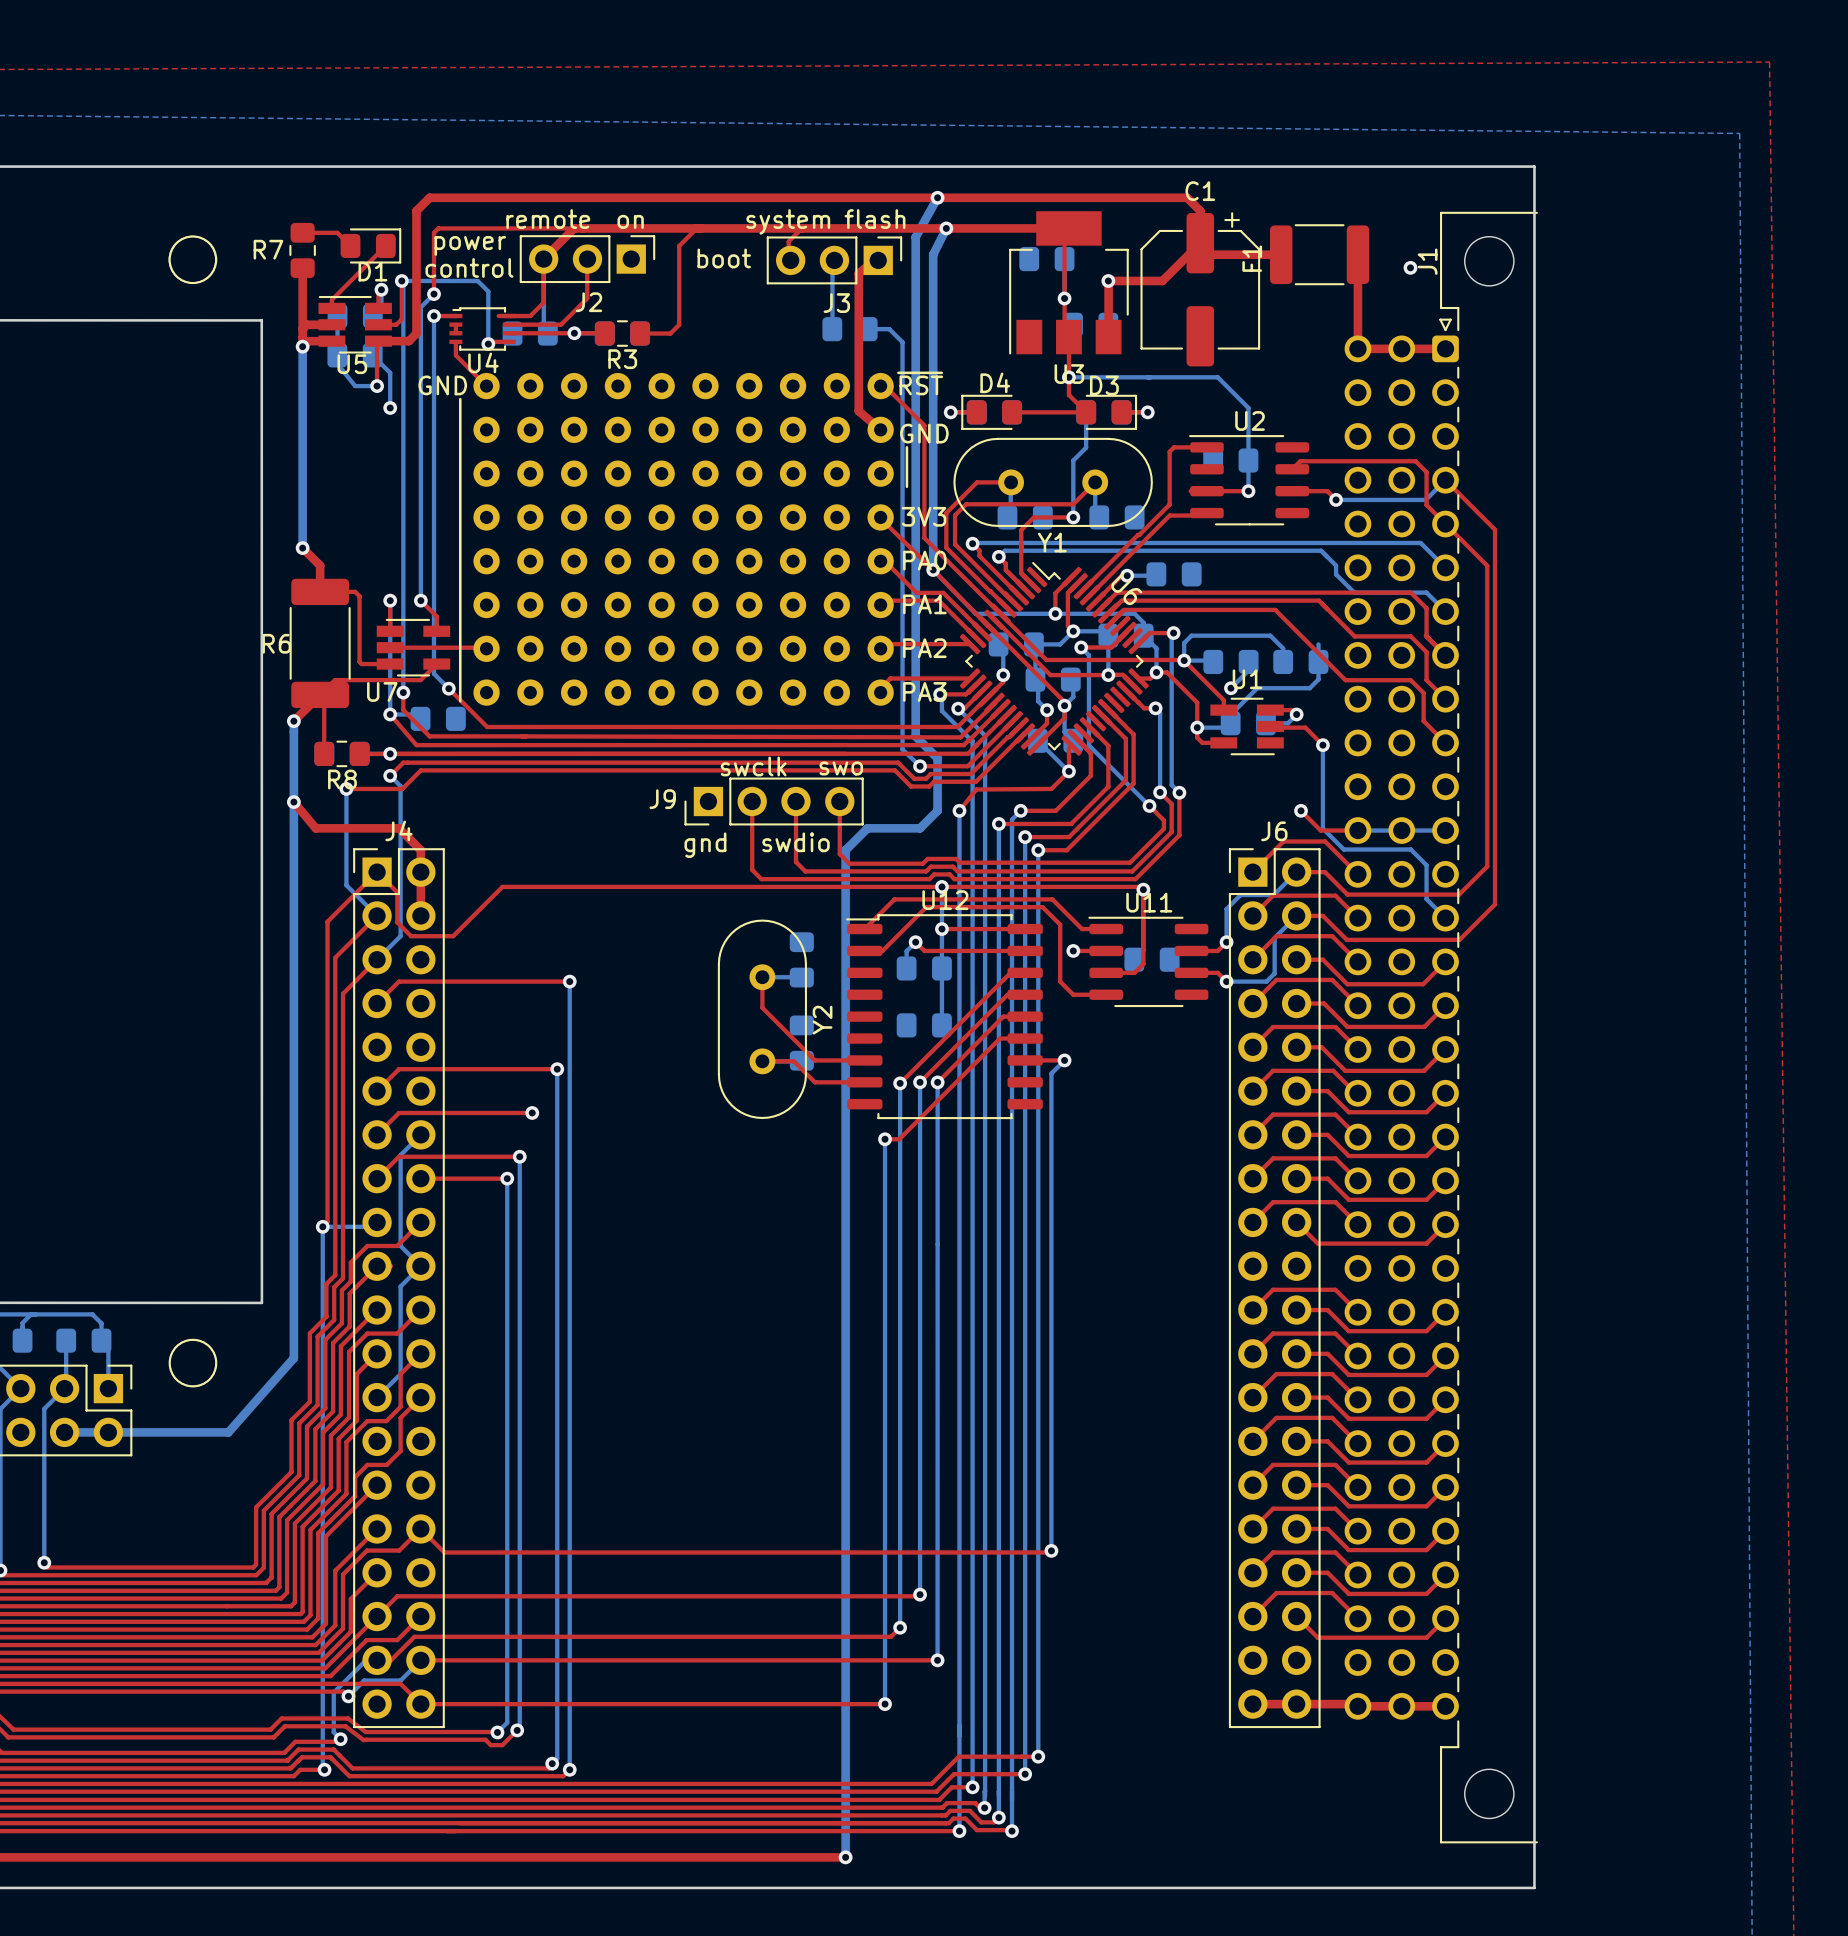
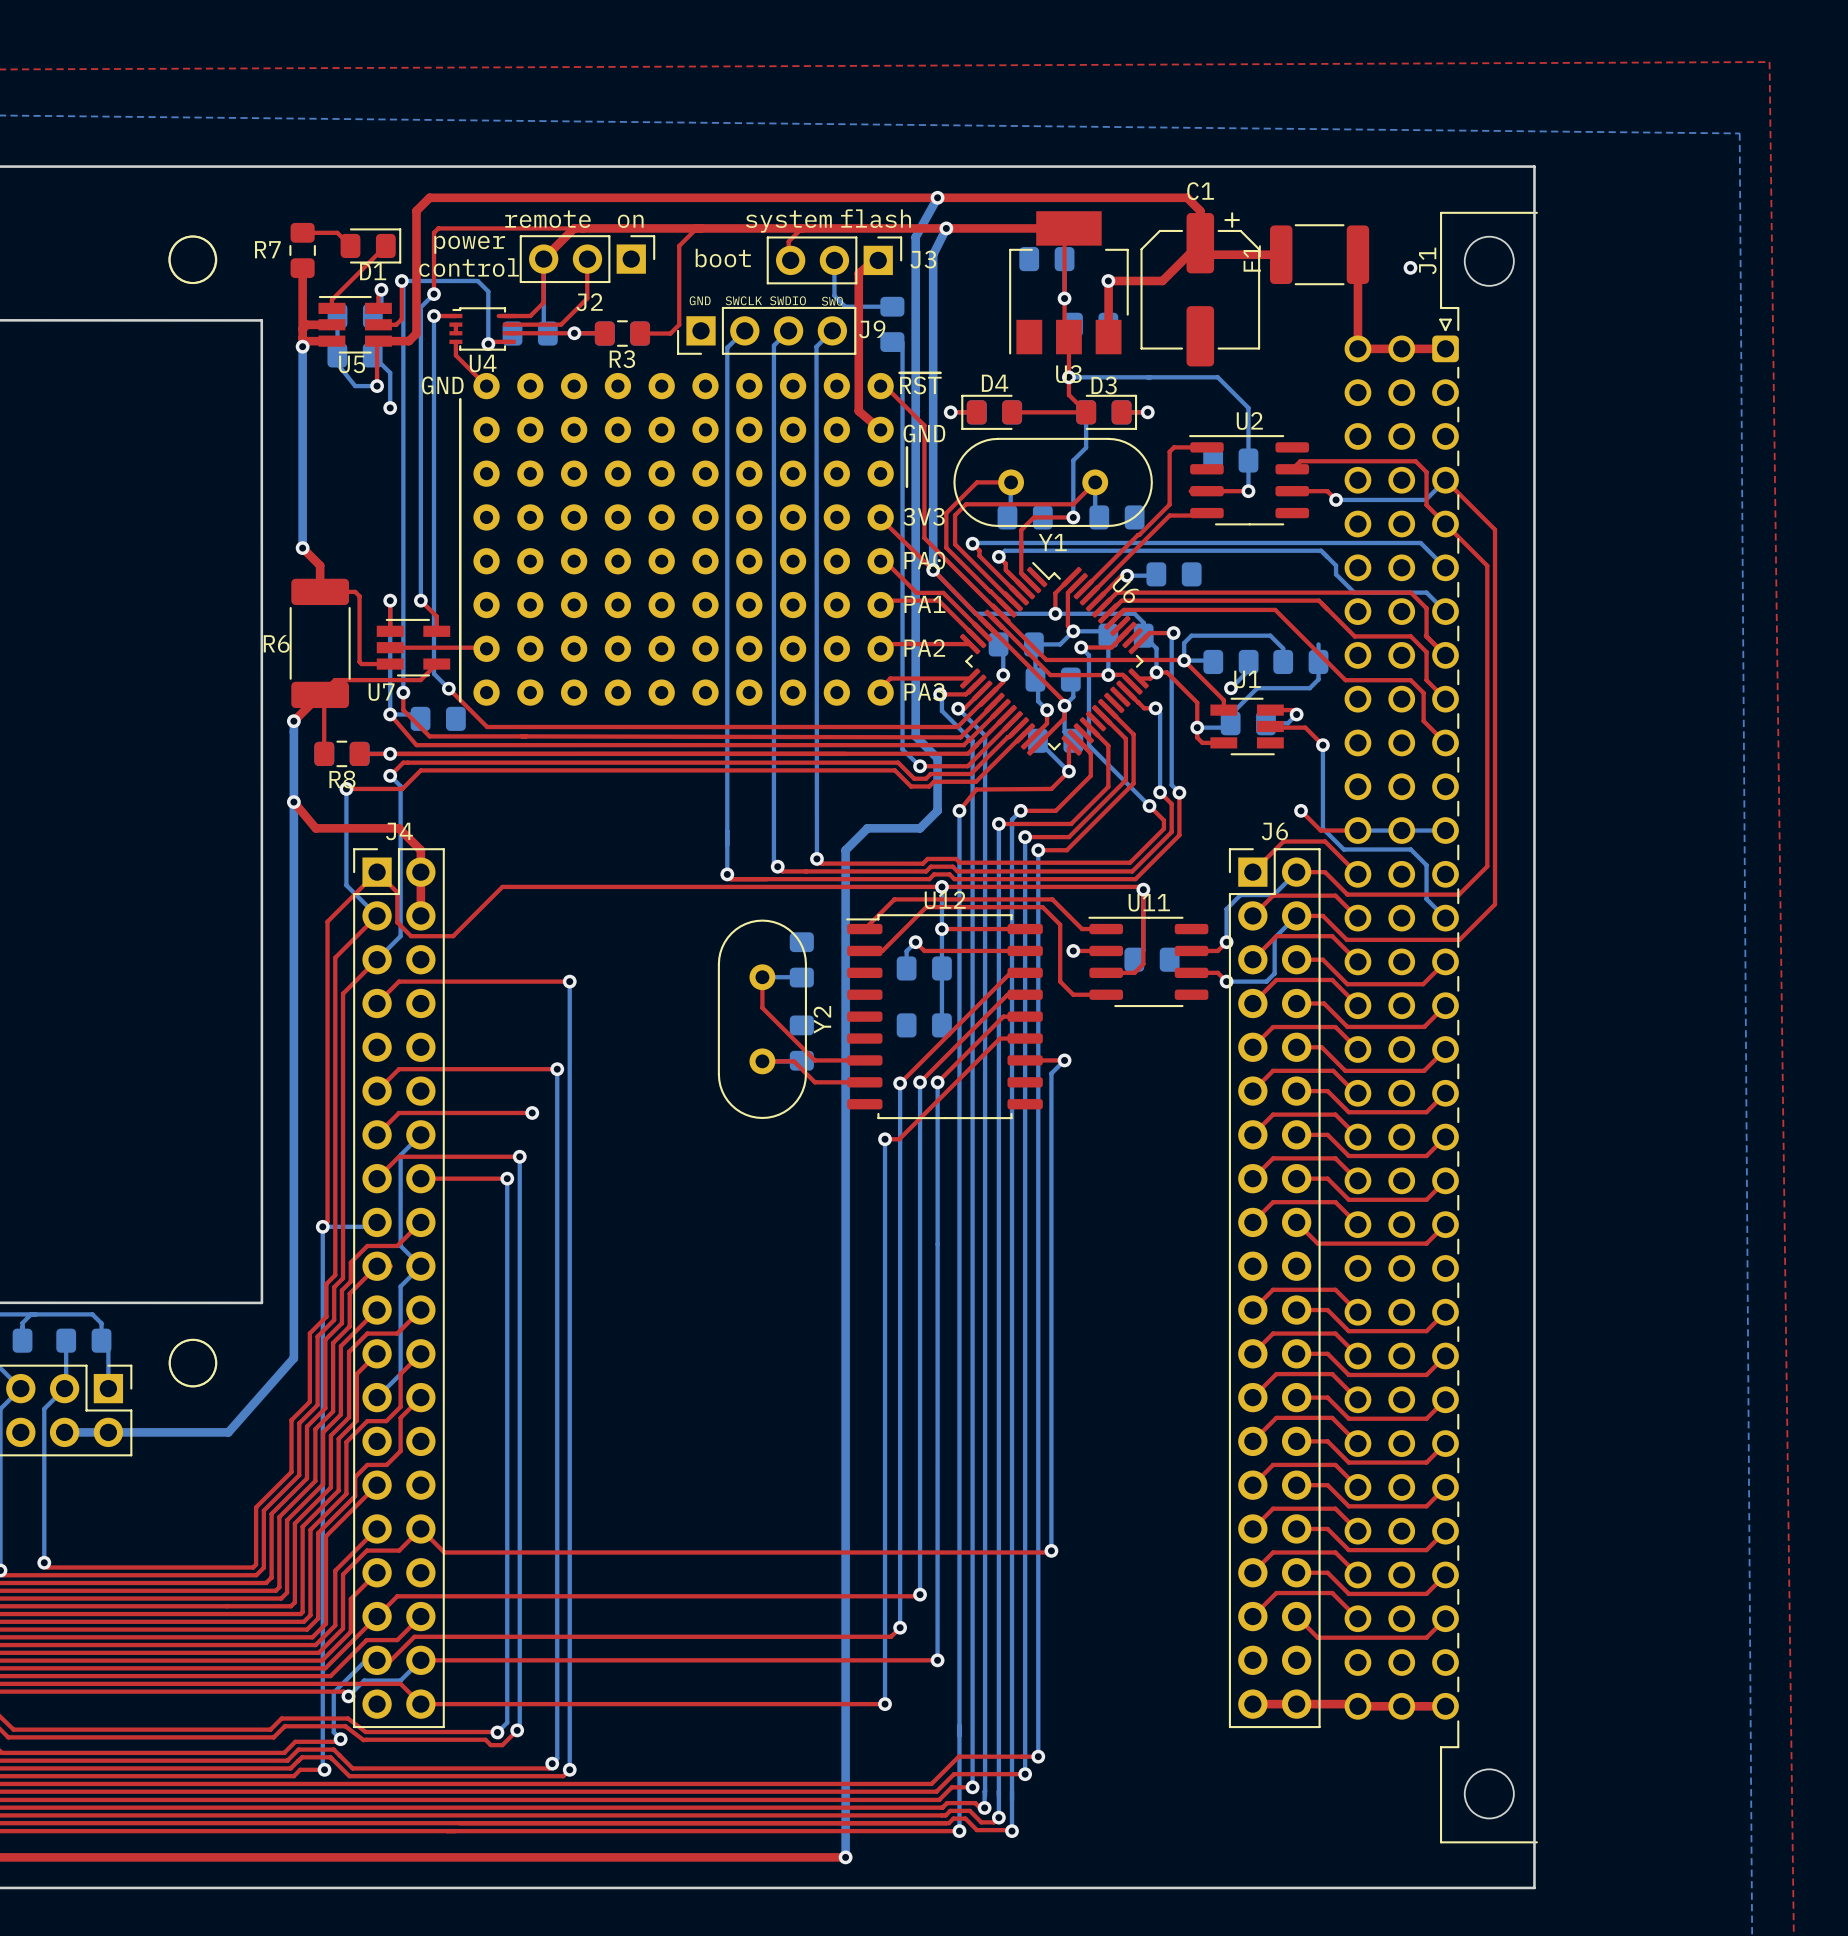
bottom track: (832, 259) (832, 329) -> none
bottom track: none -> (834, 260) (834, 295) (845, 306) (892, 306)
text: none -> GND (700, 300)
text: none -> SWCLK (743, 300)
text: none -> SWDIO (788, 300)
text: none -> SWO (832, 301)
J3 name position: J3 (836, 303) -> J3 (923, 259)
part rotation: 0° (849, 329) -> 90° clockwise (892, 324)
part position: (849, 329) -> (892, 324)
bottom track: (867, 329) (889, 329) (902, 342) -> none
bottom track: none -> (744, 330) (727, 347) (727, 874)
bottom track: none -> (788, 330) (773, 345) (773, 862) (777, 866)
bottom track: none -> (832, 330) (816, 346) (816, 858)
text: swclk (753, 766) -> none
text: swo (841, 768) -> none
J9 name position: J9 (662, 799) -> J9 (872, 329)
top track: (752, 801) (752, 869) (761, 879) -> (727, 874) (730, 879) (761, 879)
J9 position: (774, 801) -> (766, 330)
top track: (796, 801) (796, 862) (805, 871) -> (777, 866) (782, 871) (805, 871)
top track: (839, 801) (839, 854) (849, 863) (922, 863) -> (816, 858) (821, 863) (922, 863)
text: swdio (796, 842) -> none
text: gnd (705, 845) -> none
via: none -> (816, 858)
via: none -> (777, 866)
via: none -> (727, 874)

